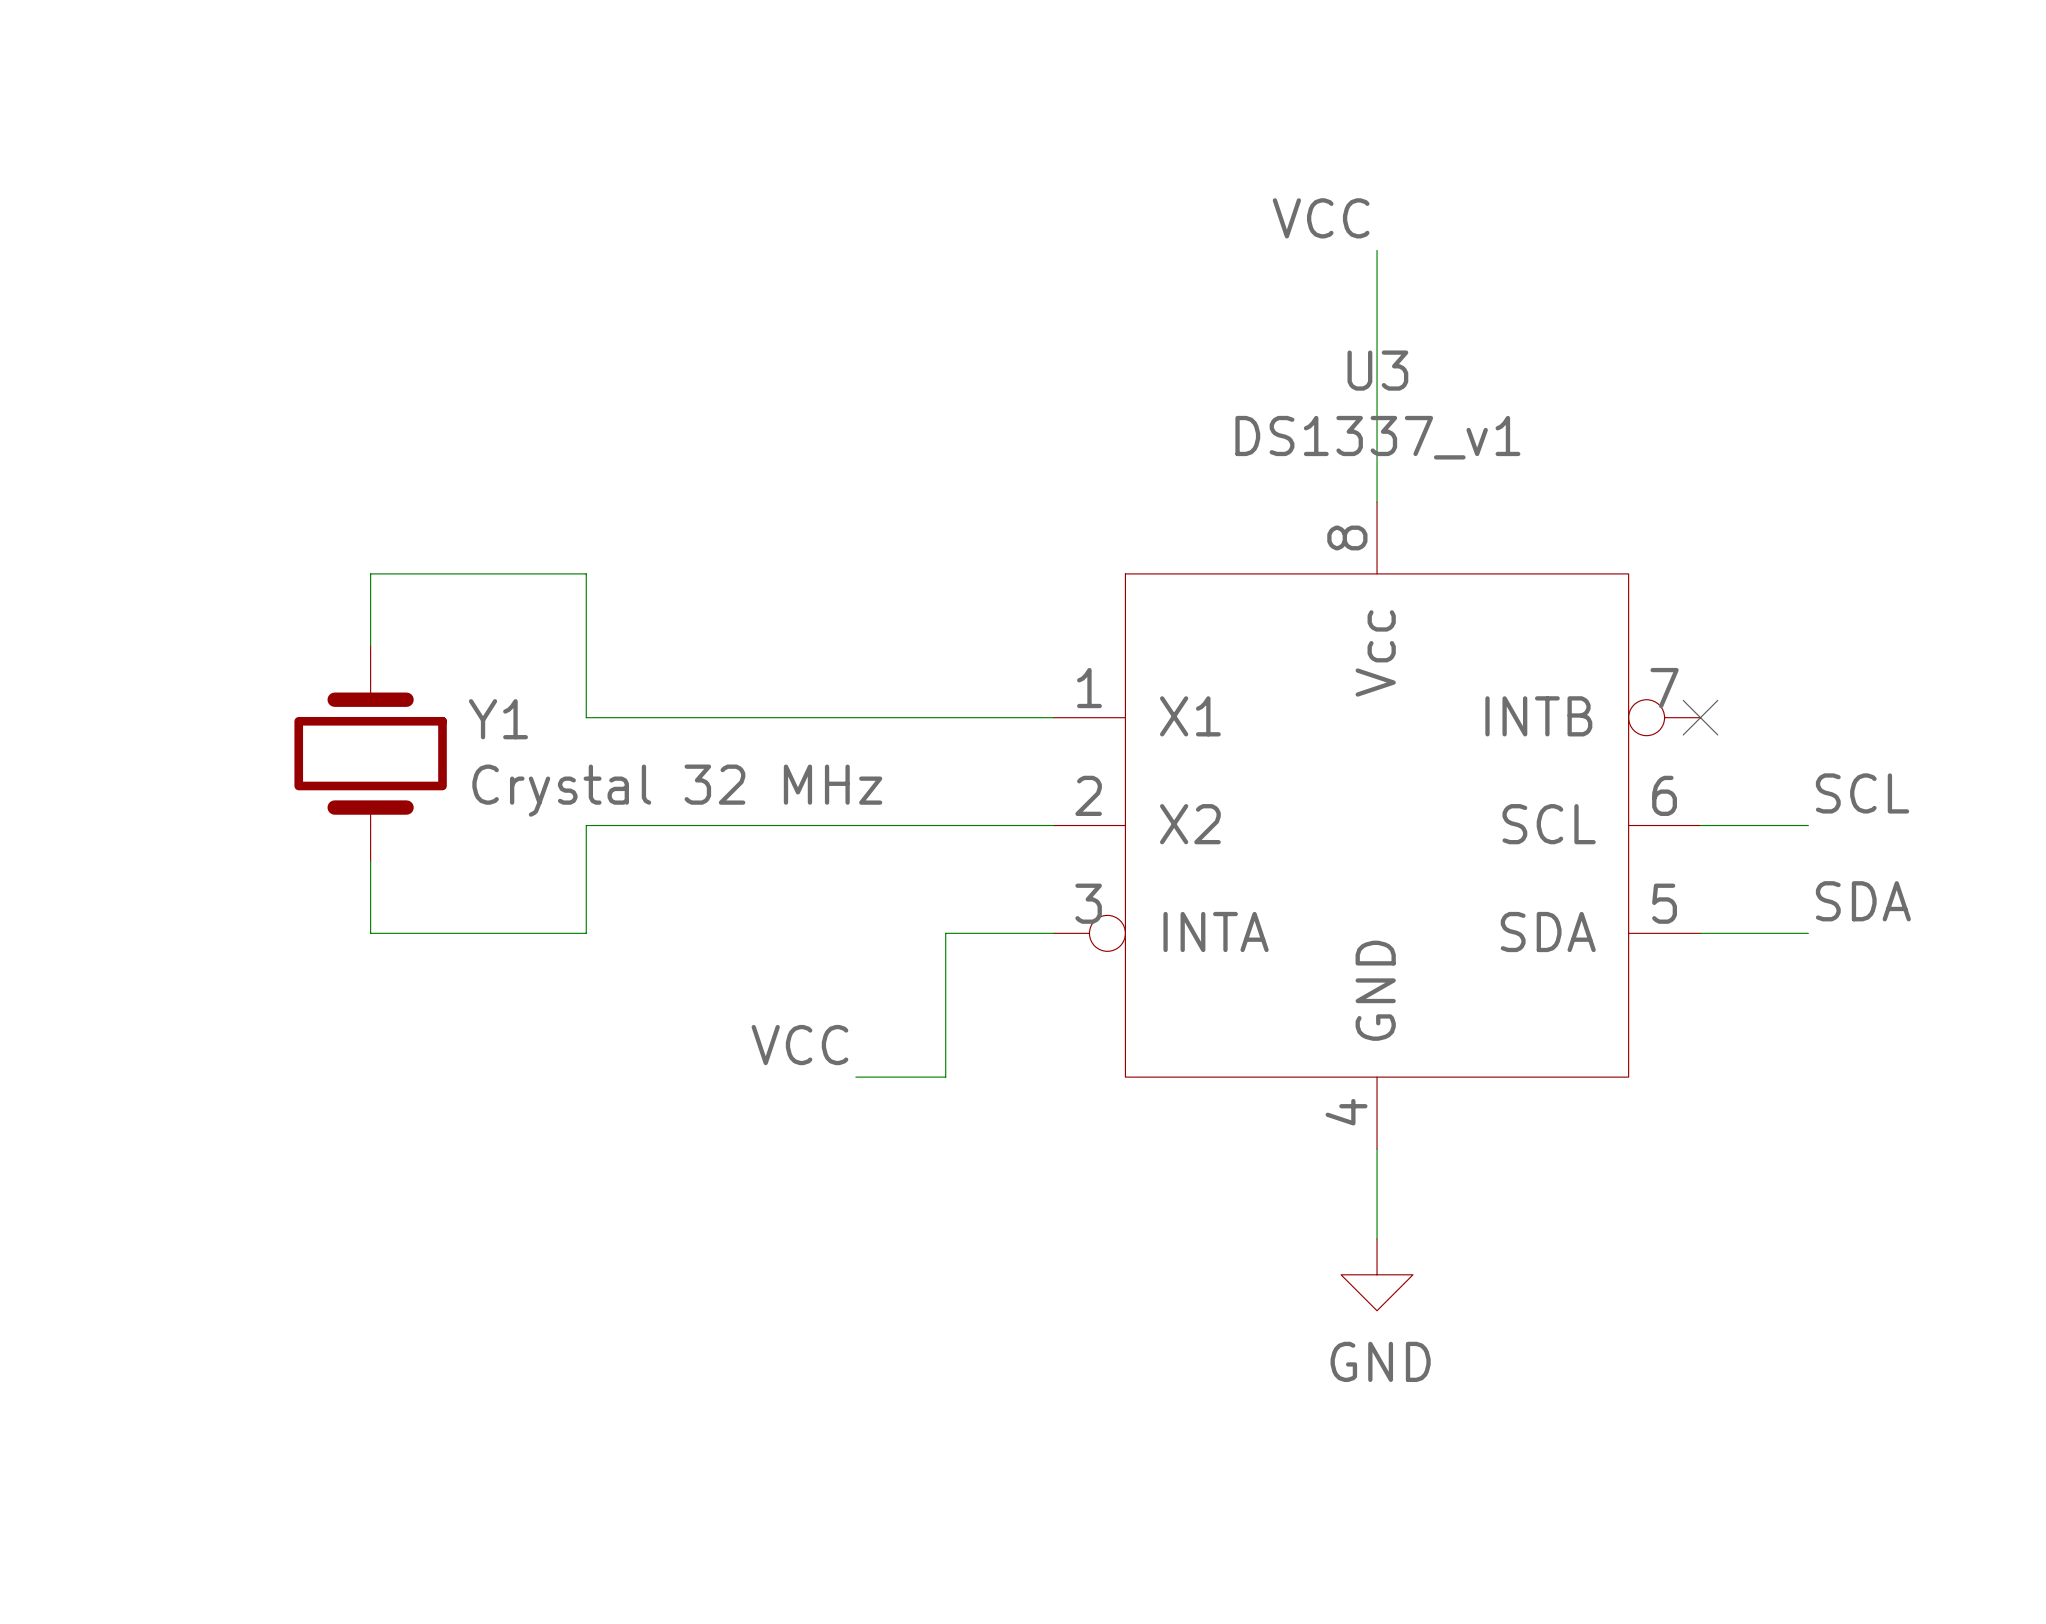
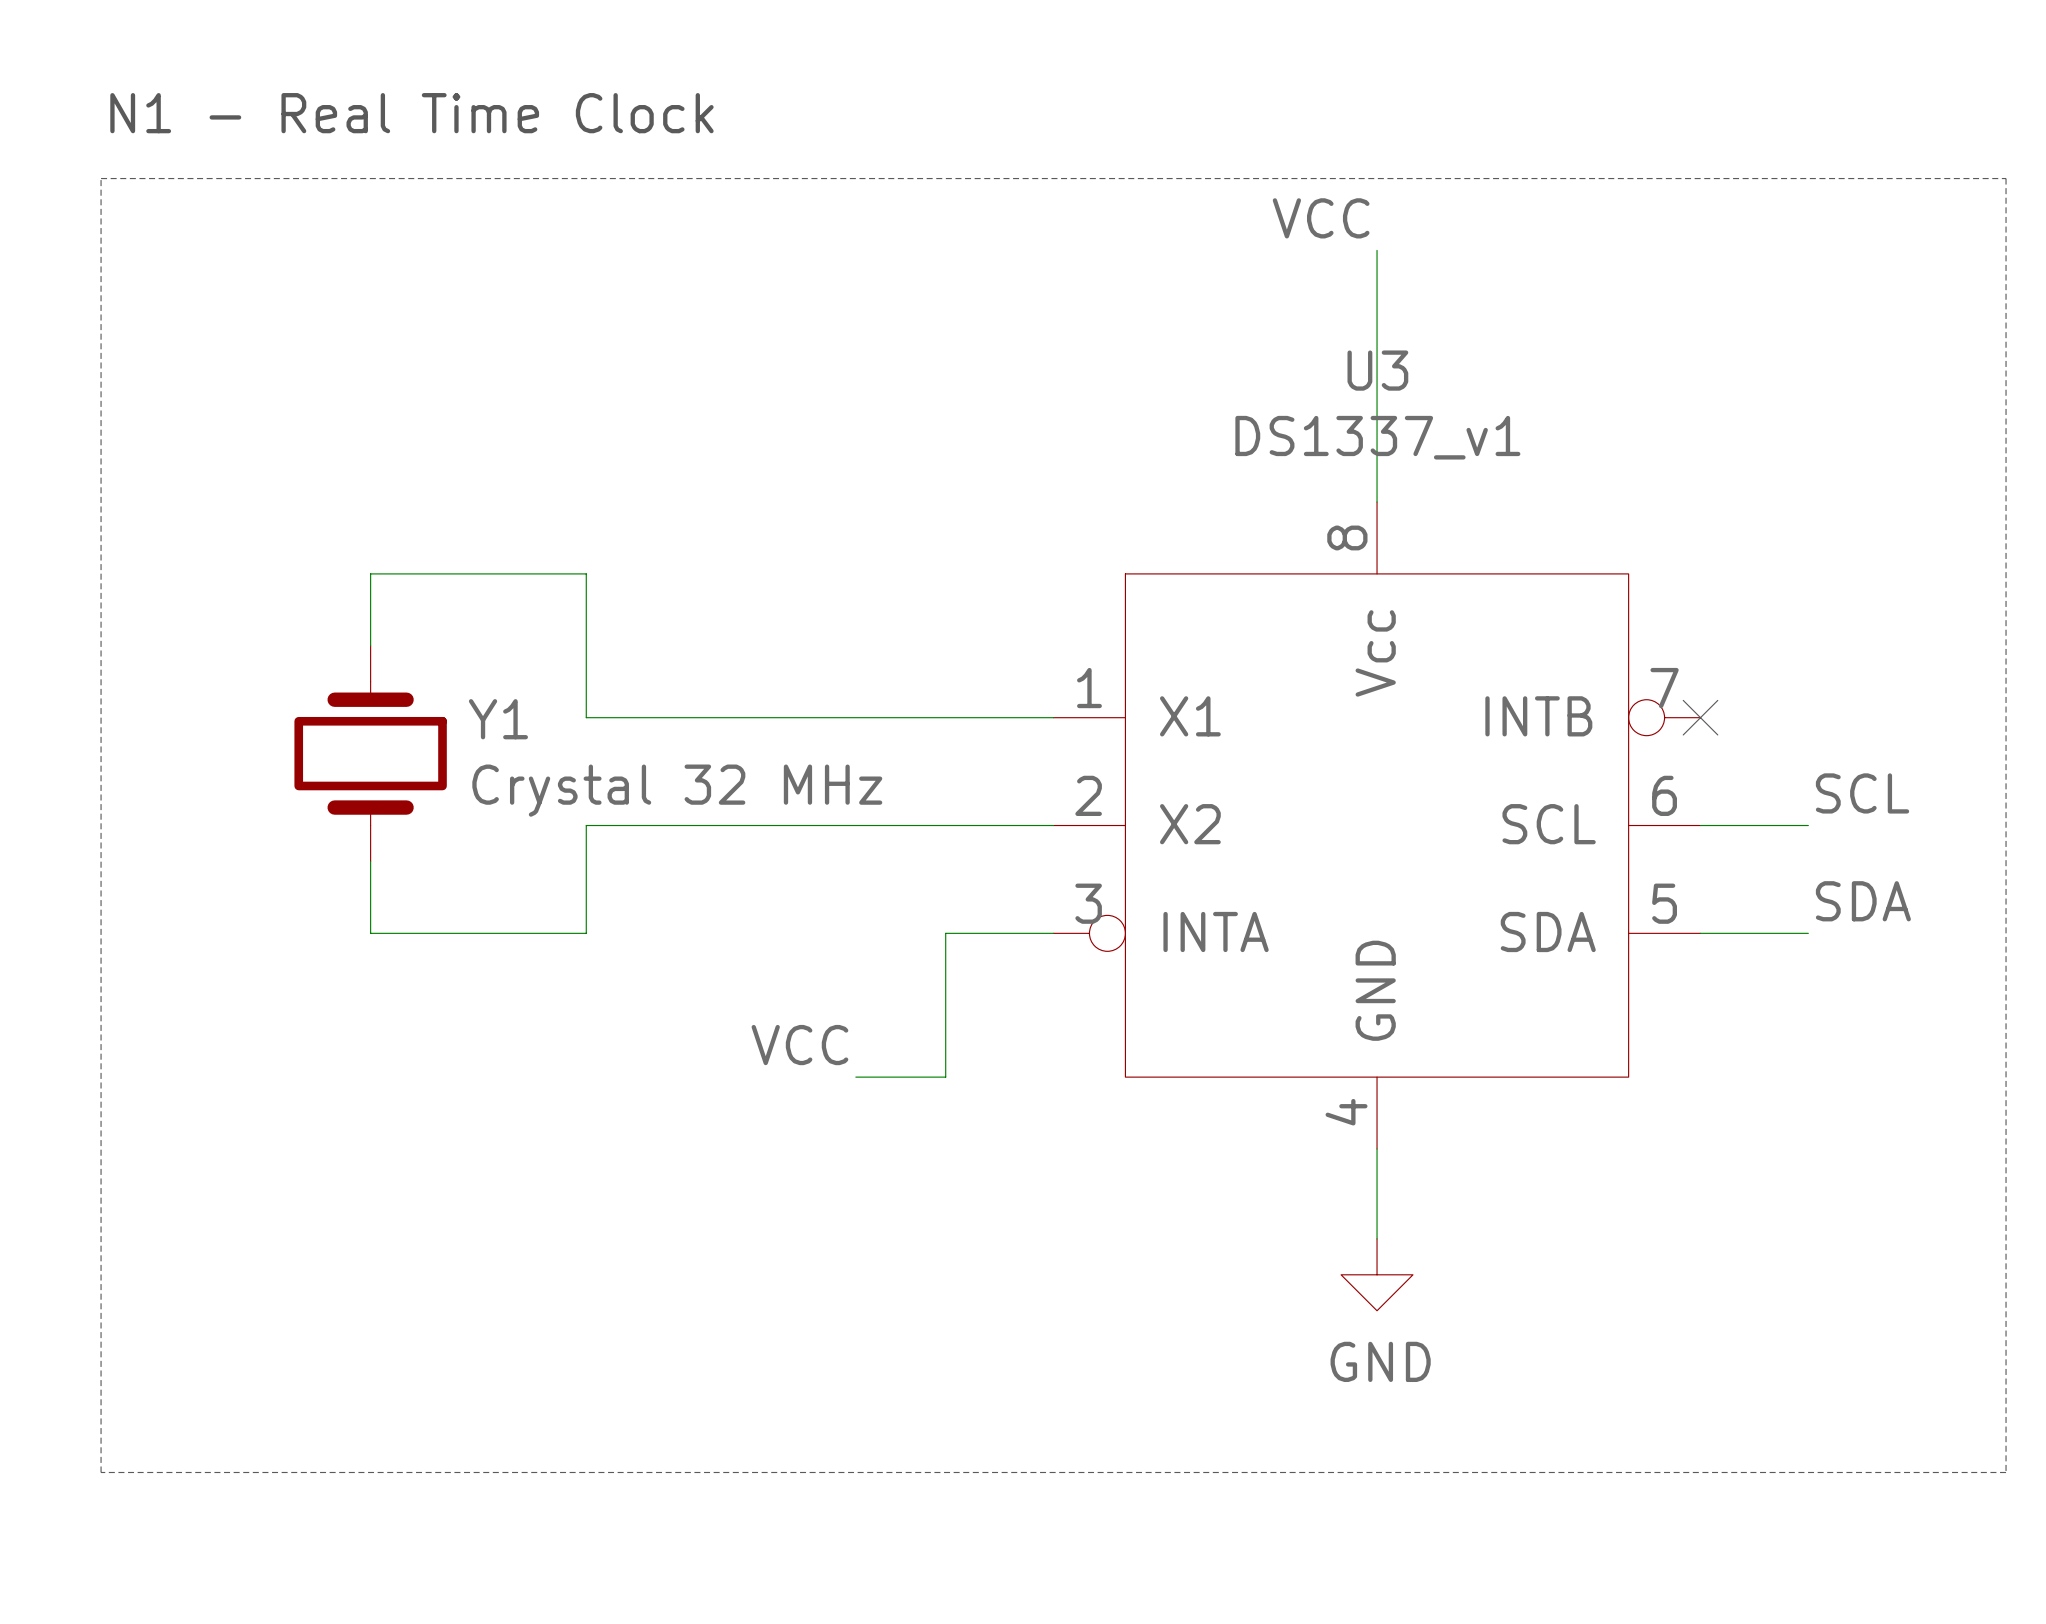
text: none -> N1 - Real Time Clock (411, 113)
line: none -> (101, 178) (2006, 178) (2006, 1472) (101, 1472) (101, 178)

